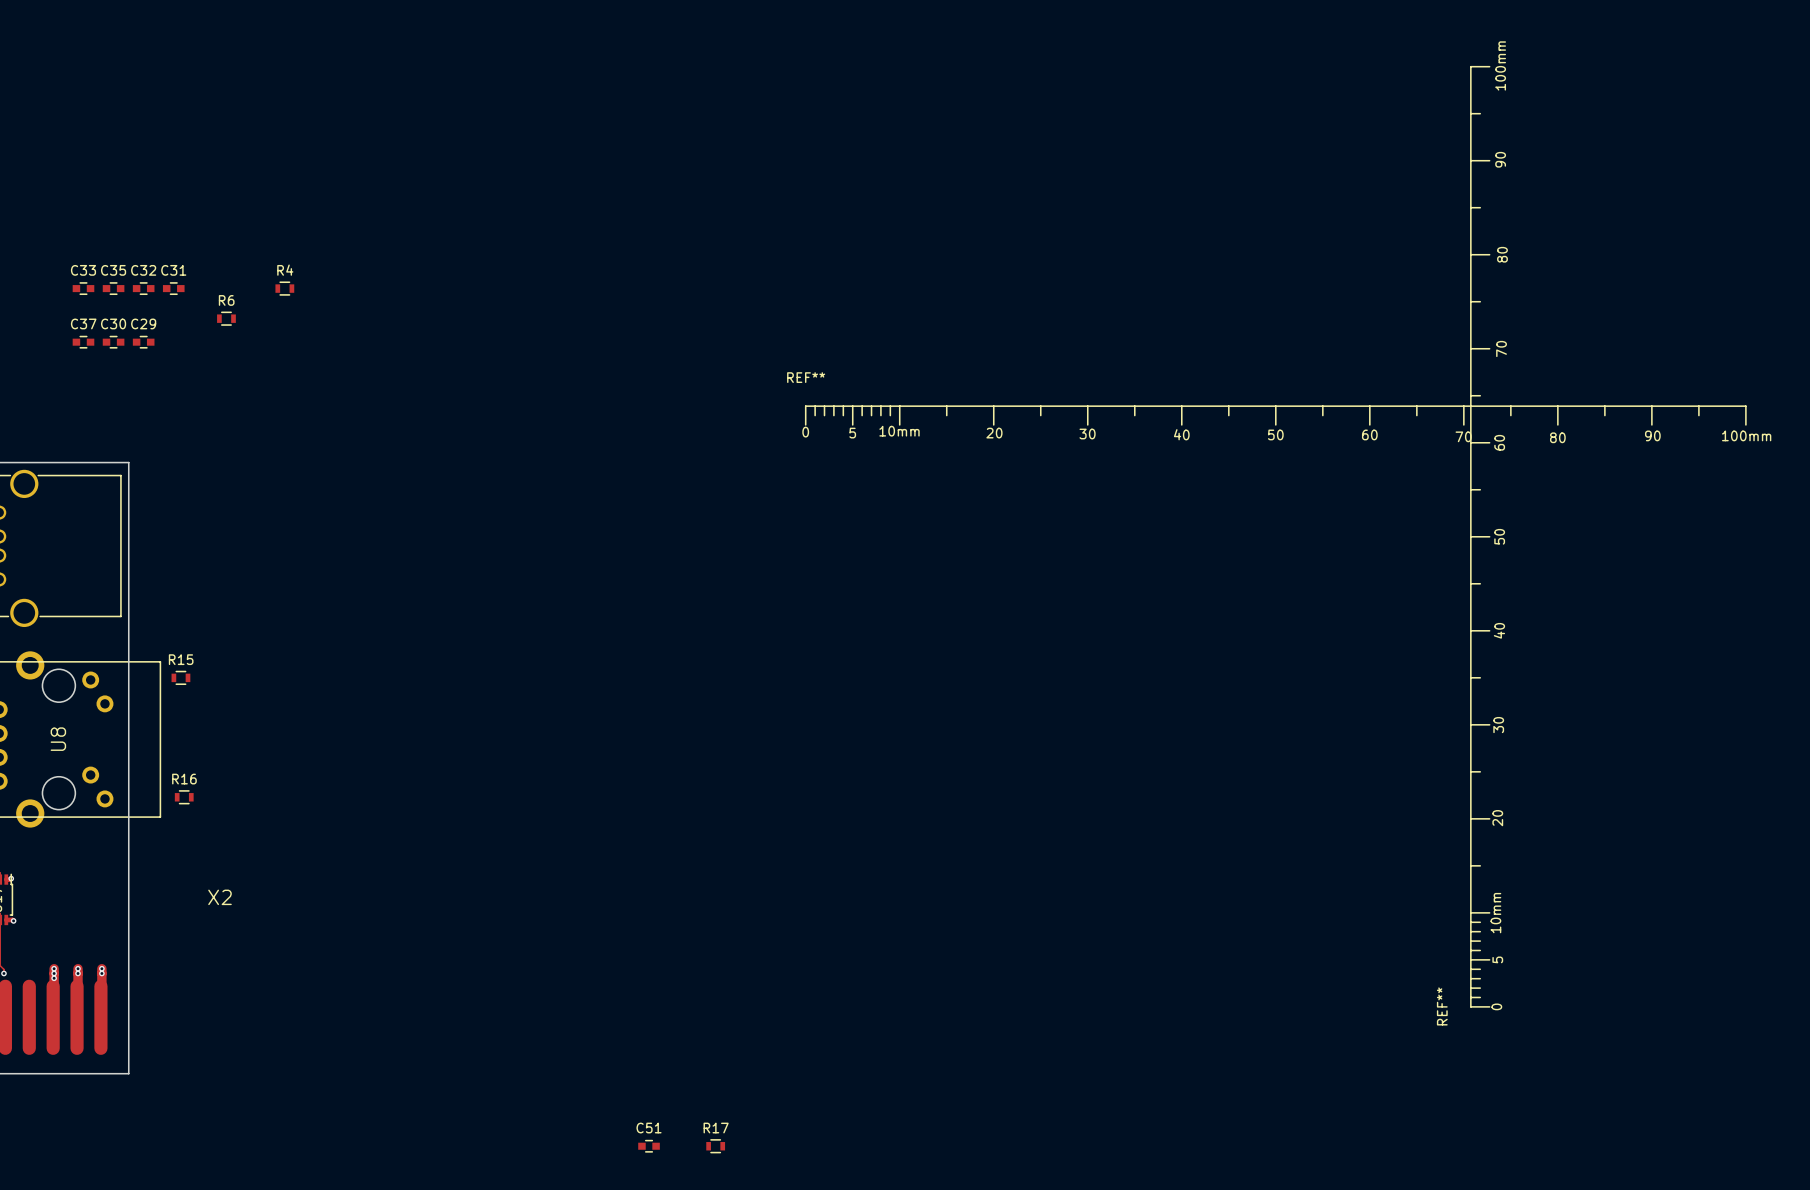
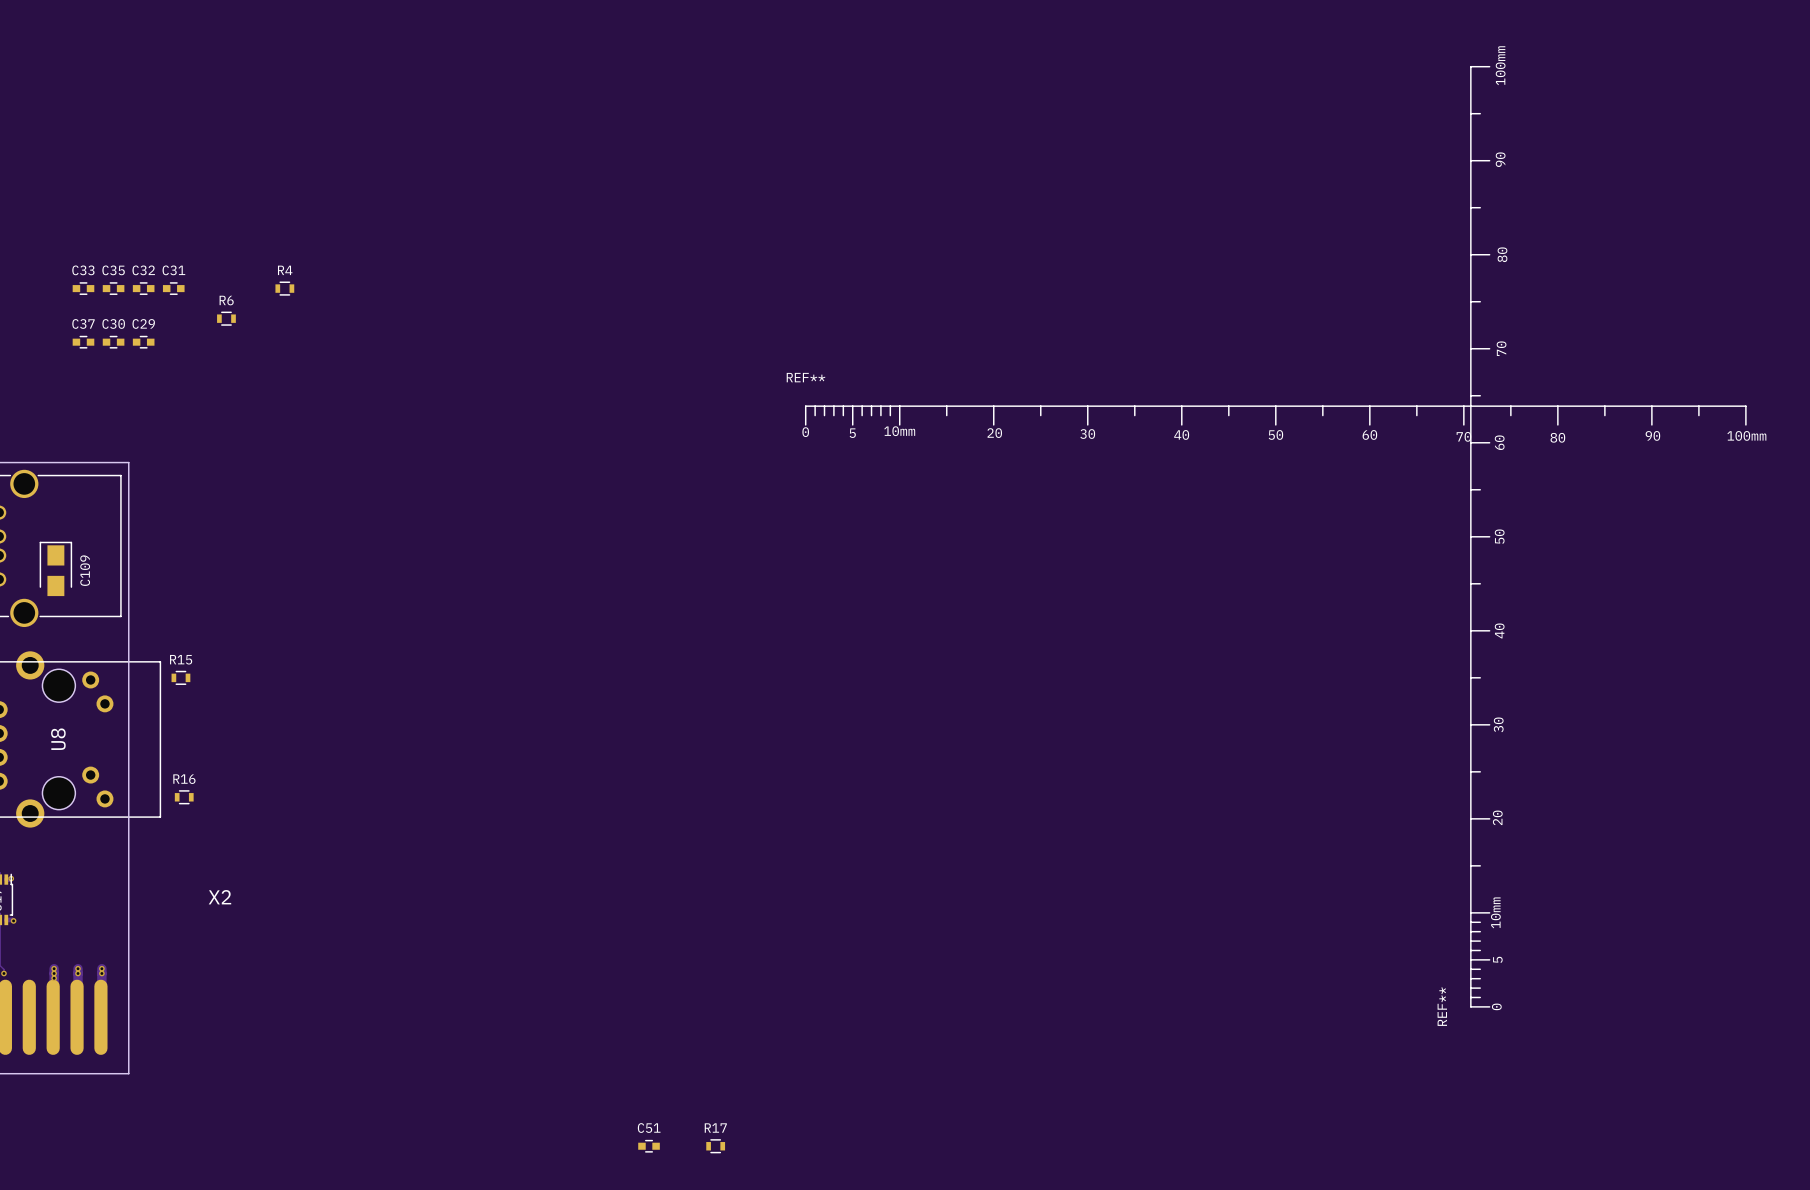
C109: none -> (55, 569)

